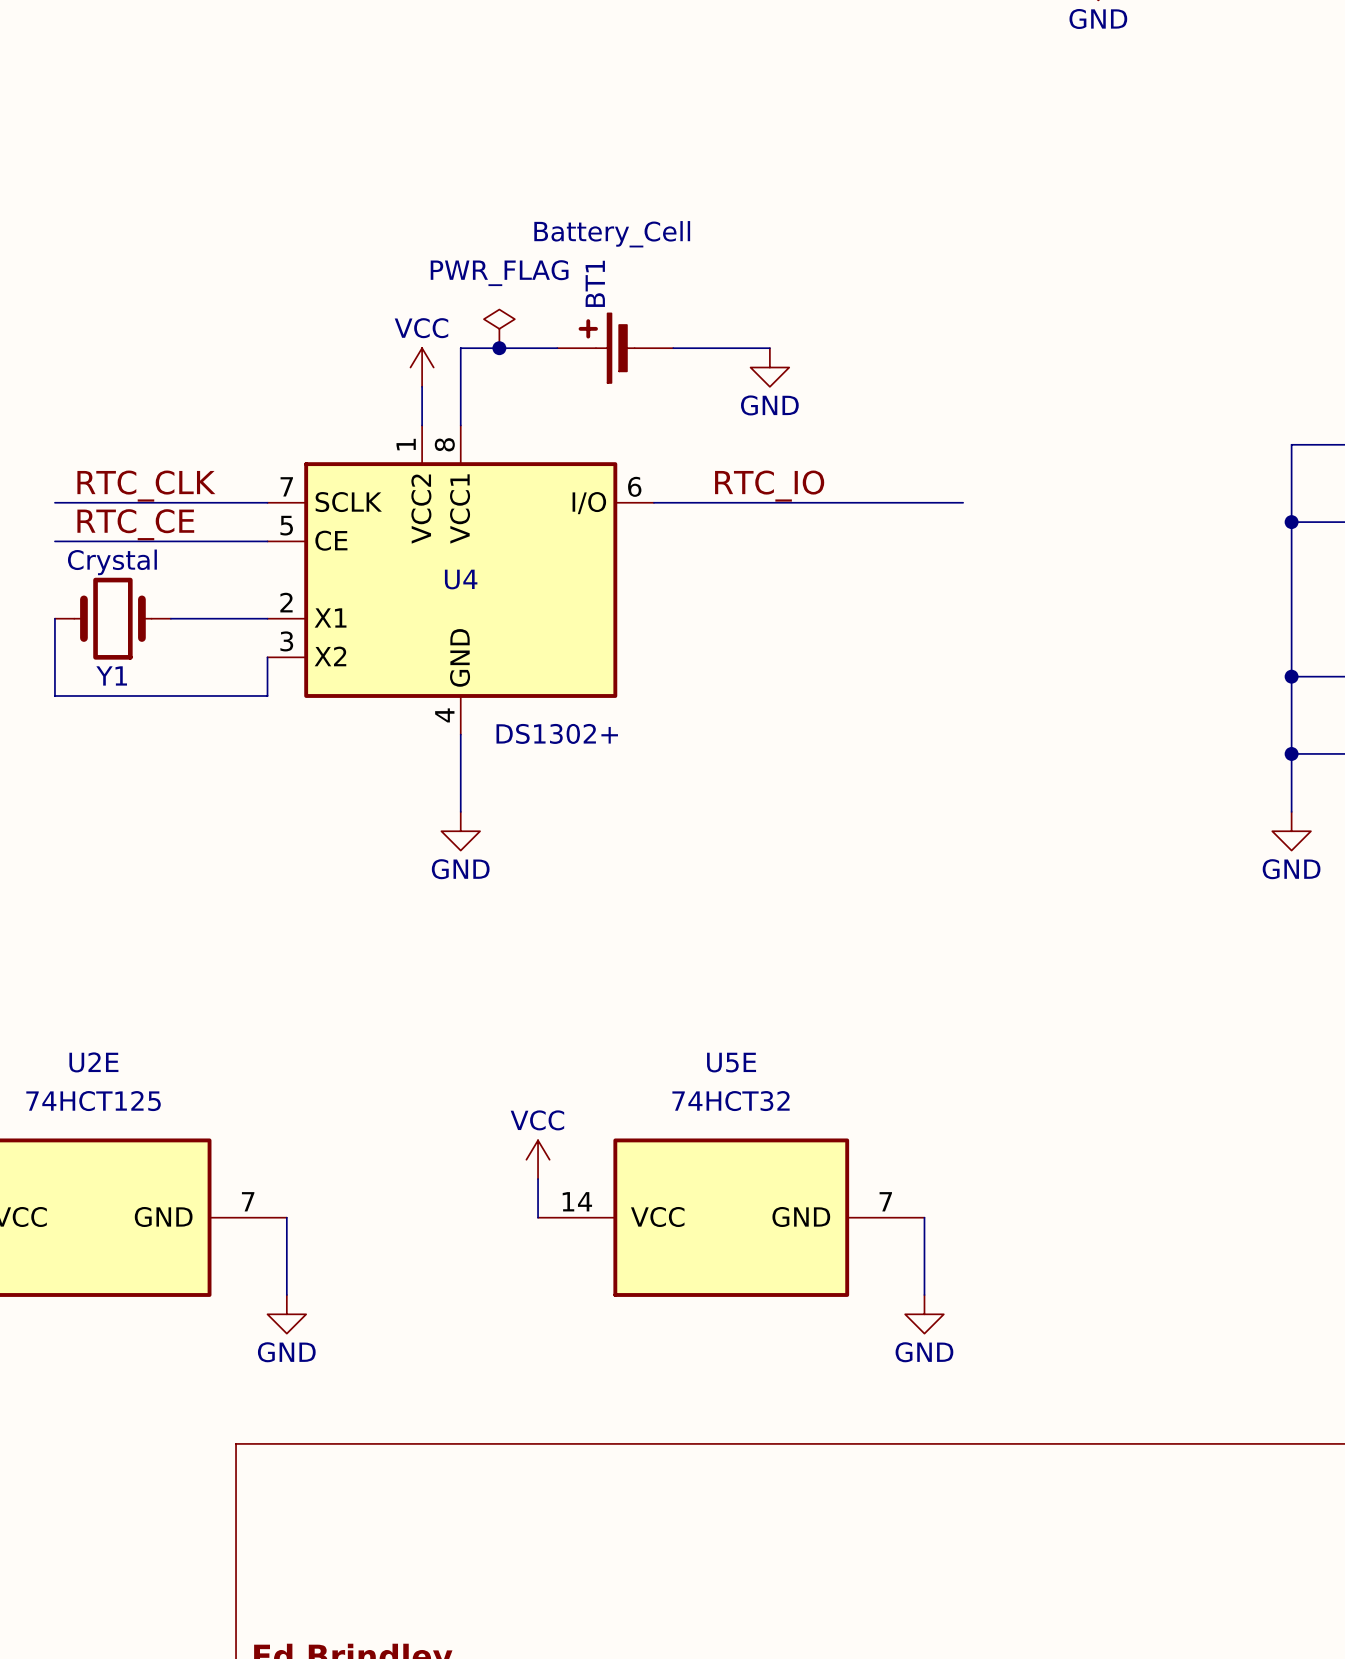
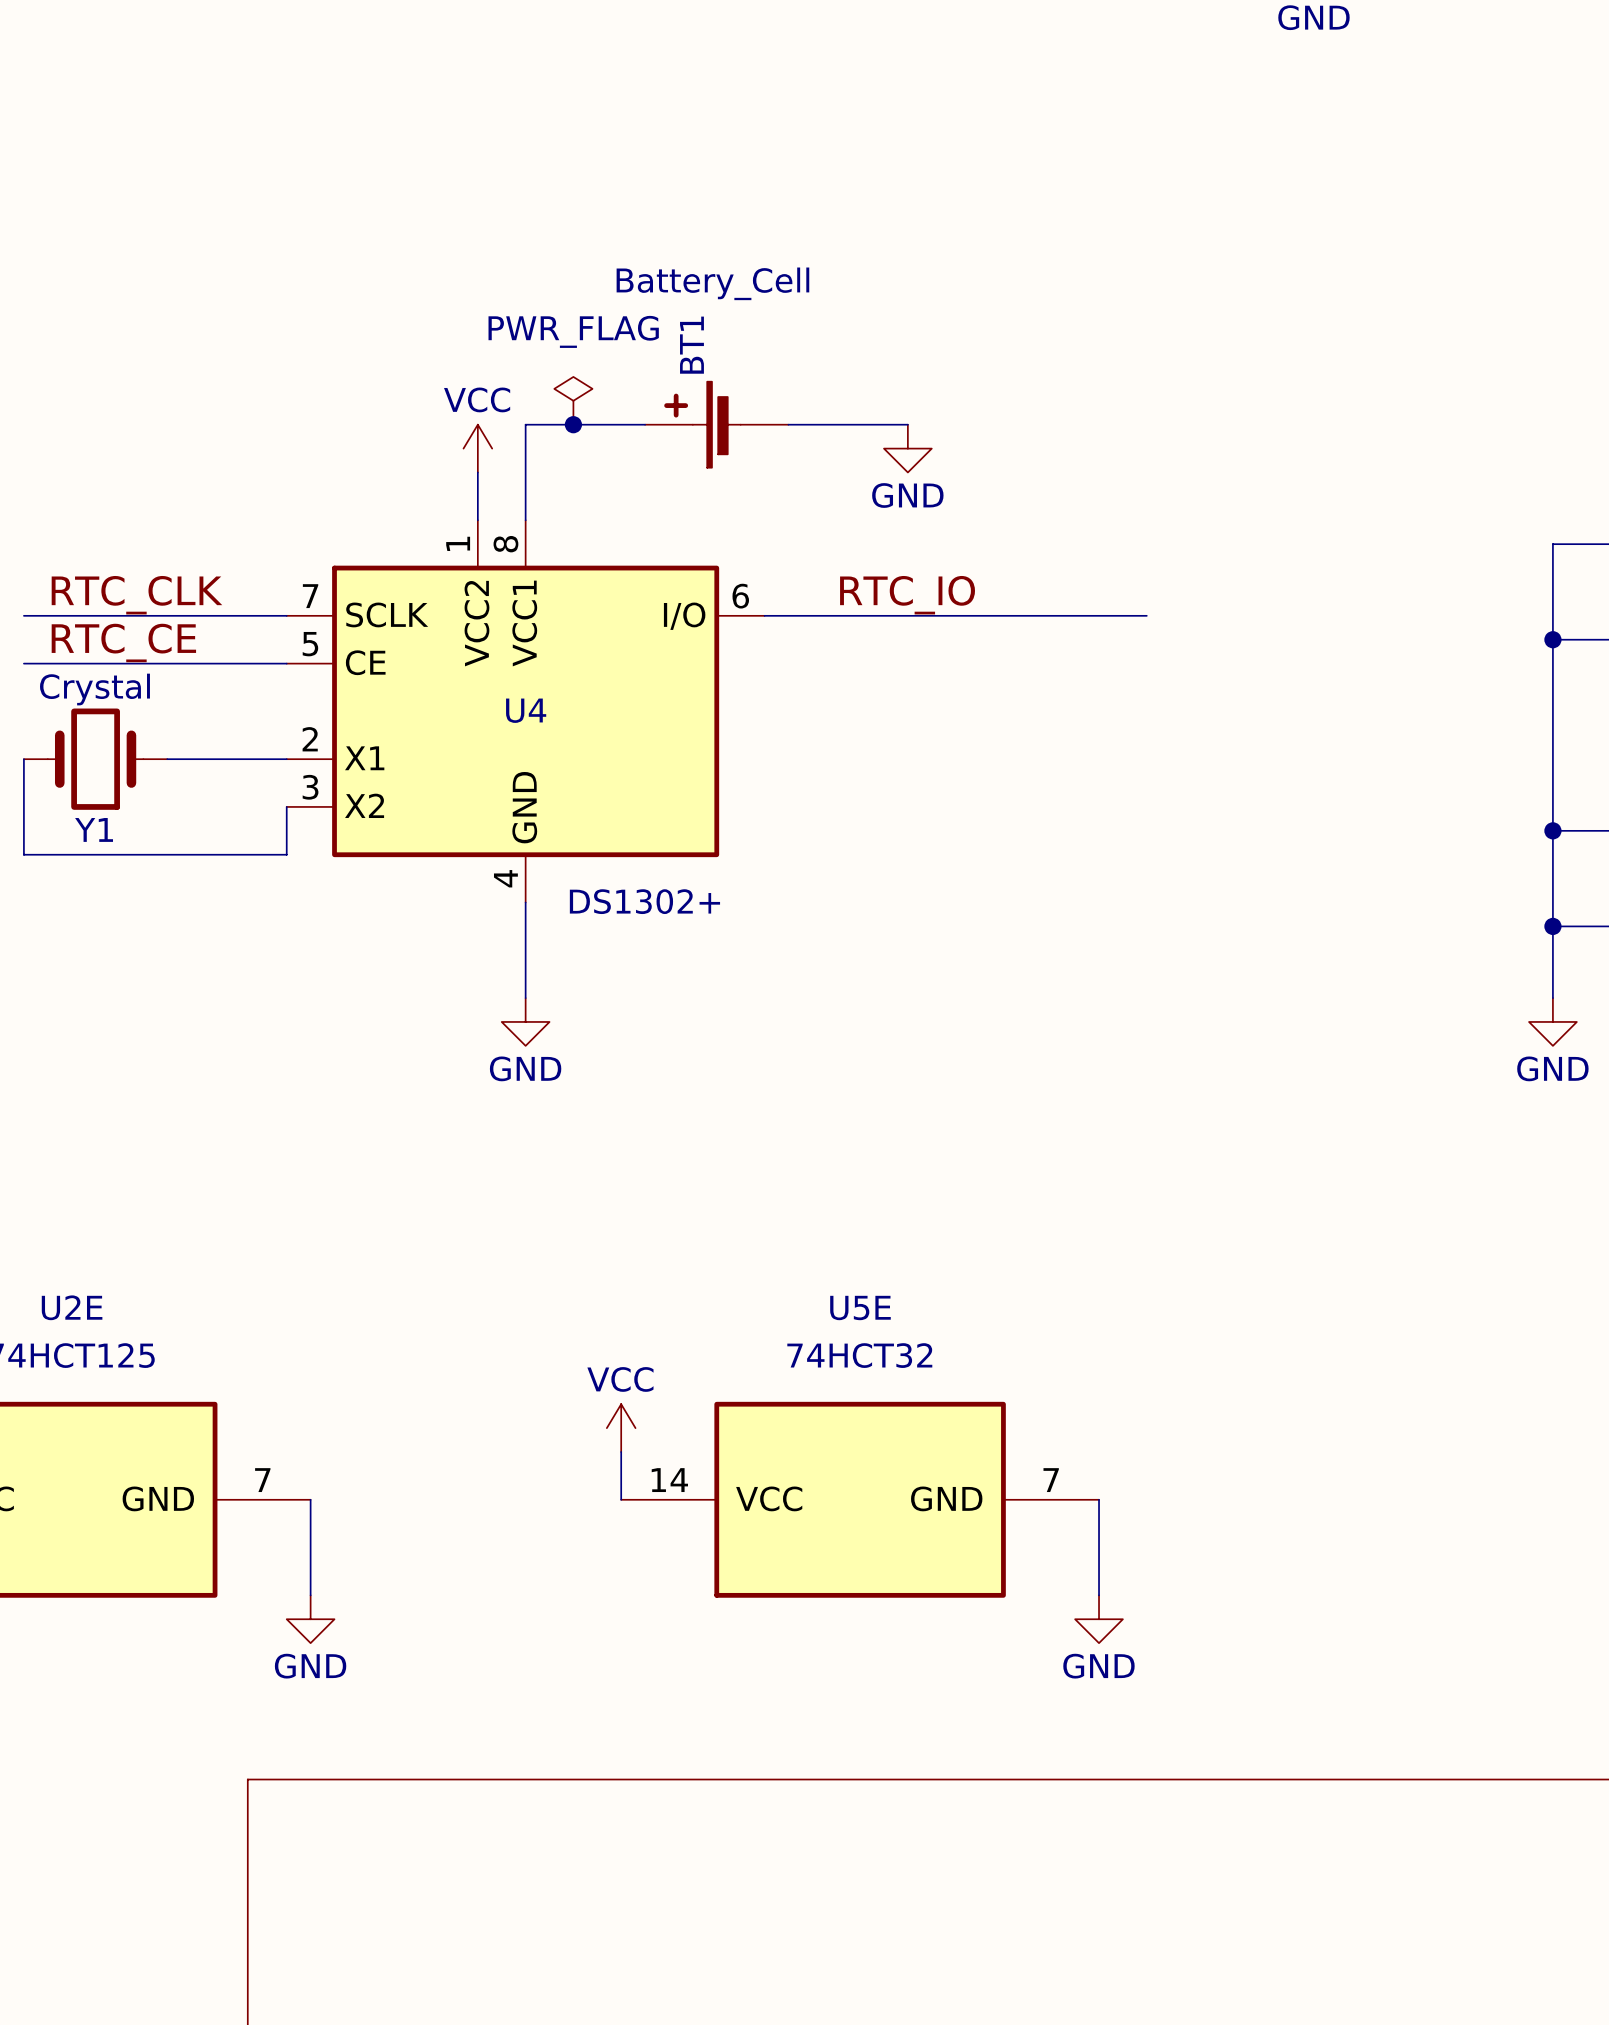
BT1 symbol: [557, 313, 674, 383] -> [645, 381, 789, 468]

